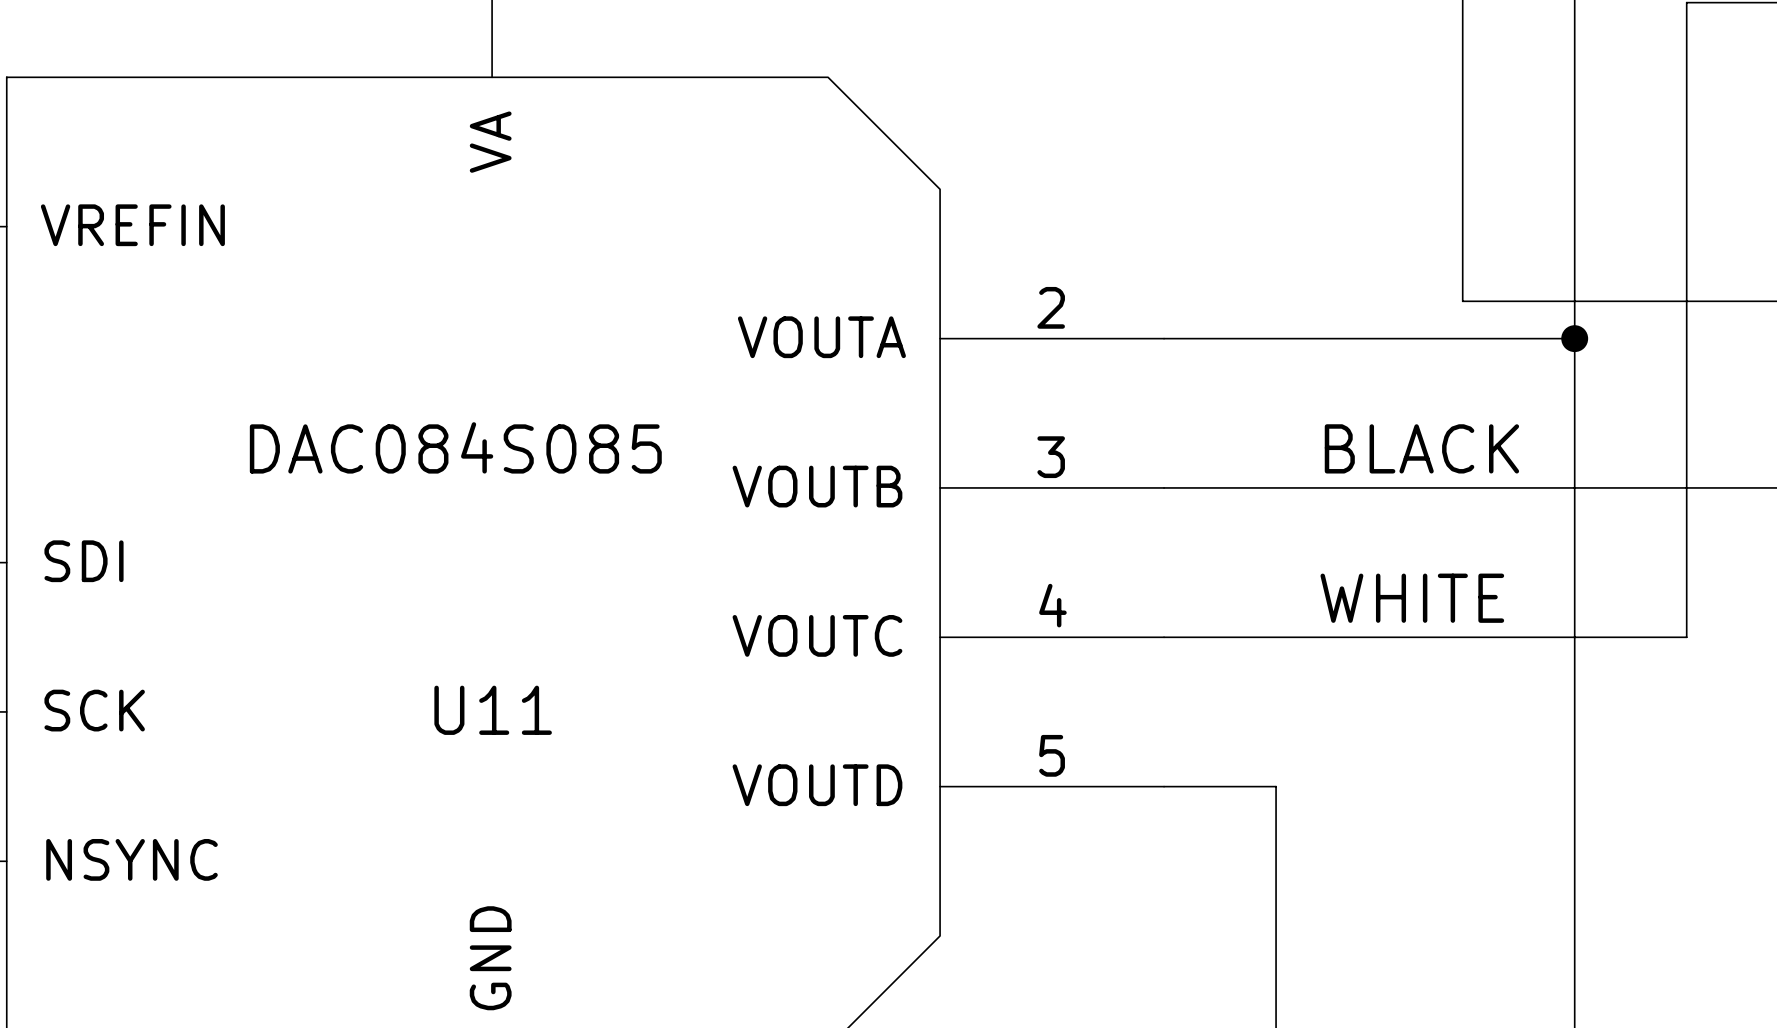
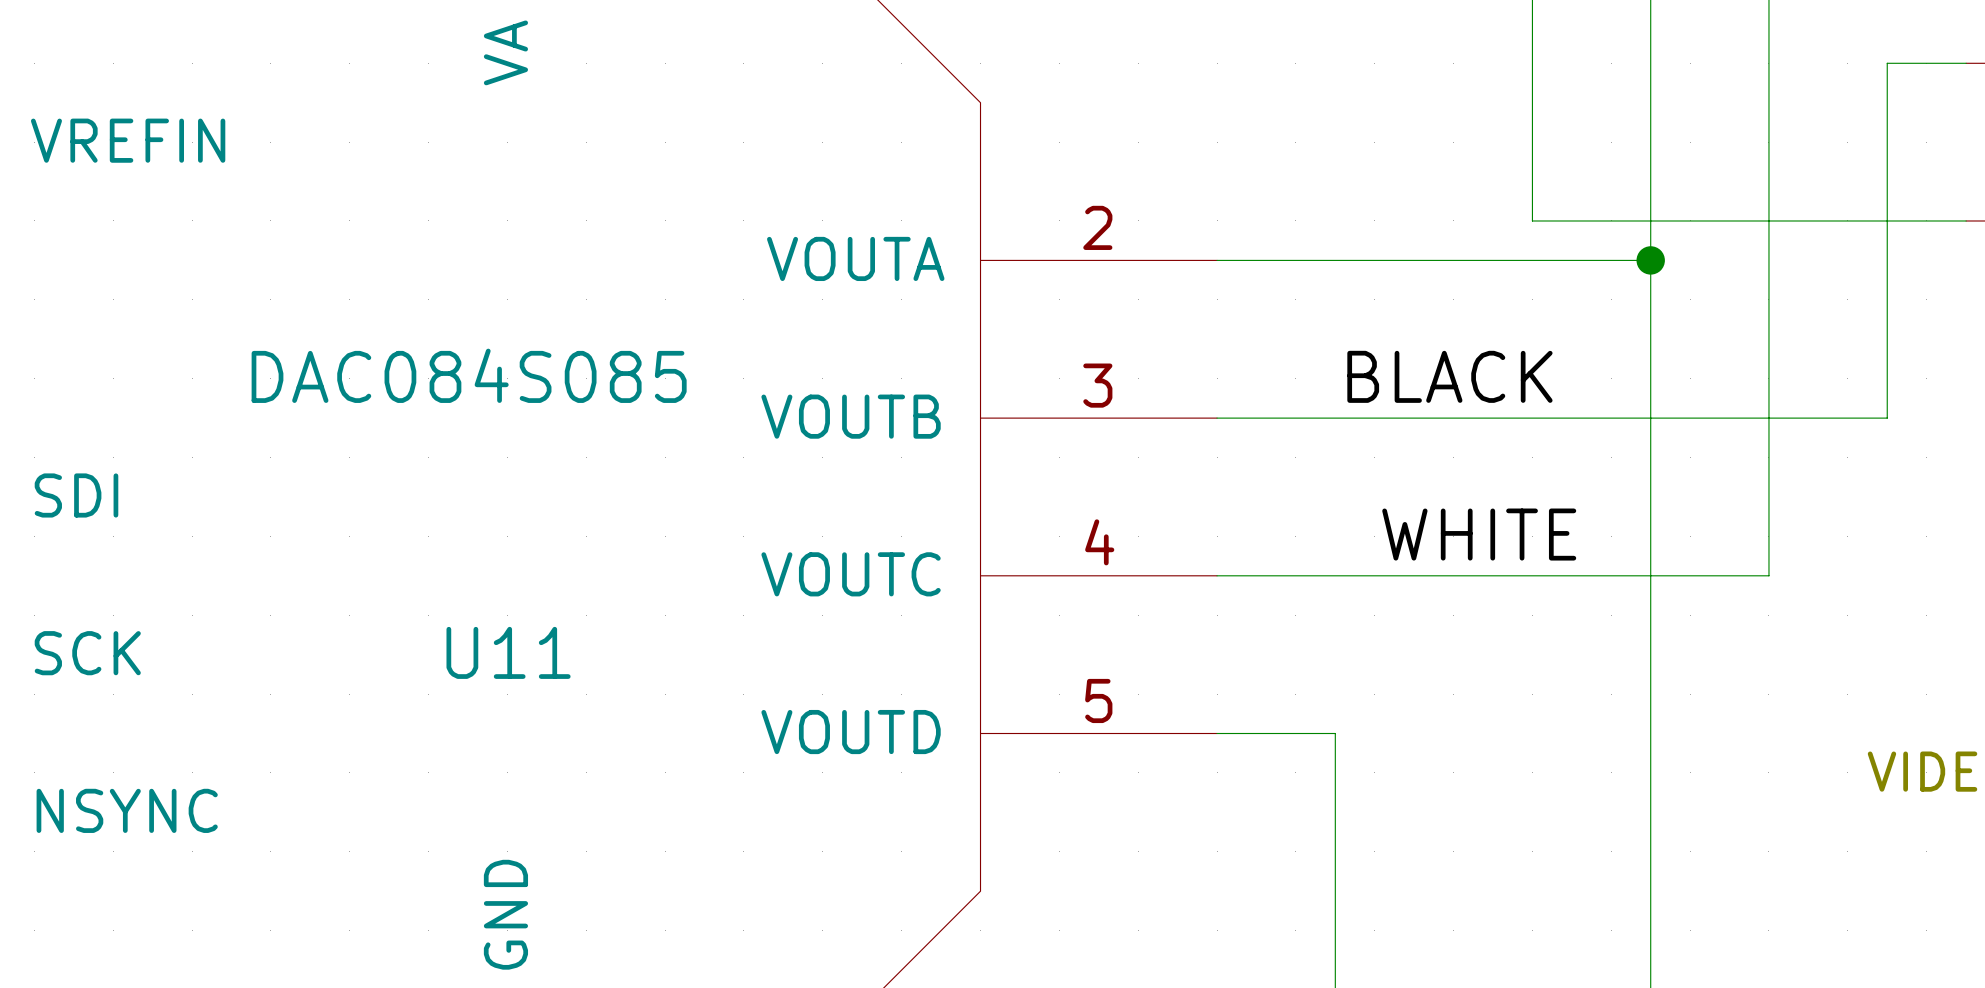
label position: BLACK (1421, 448) -> BLACK (1449, 376)

